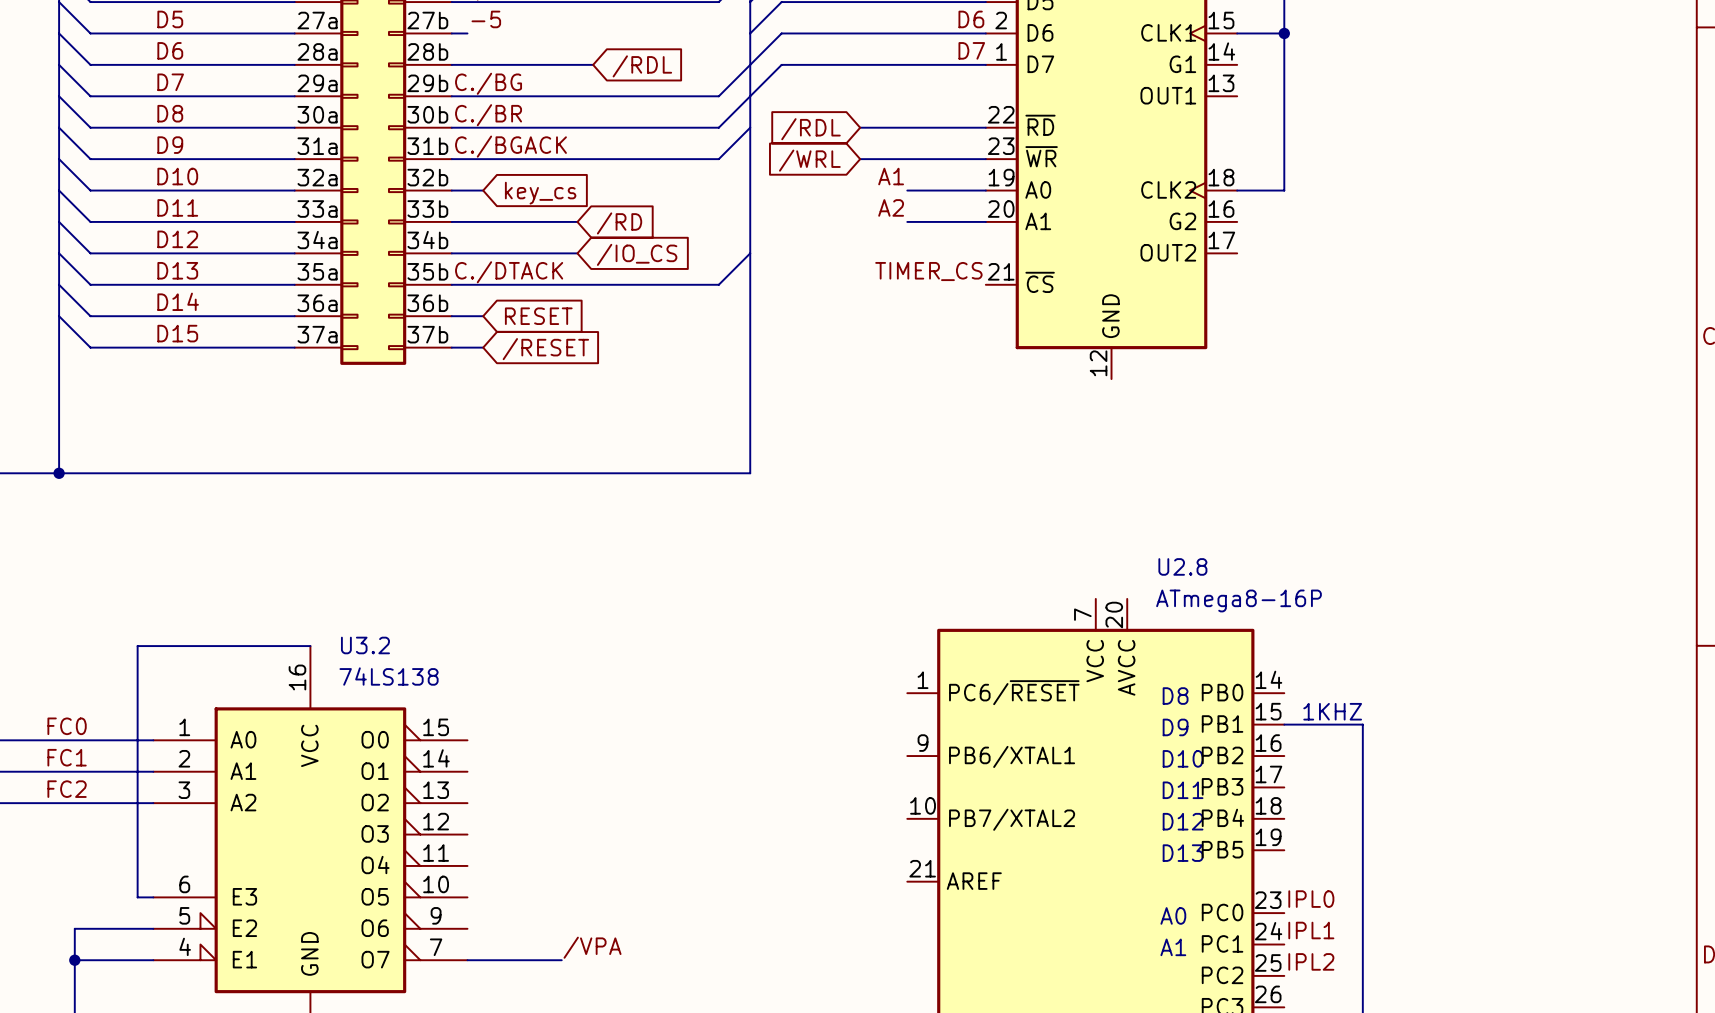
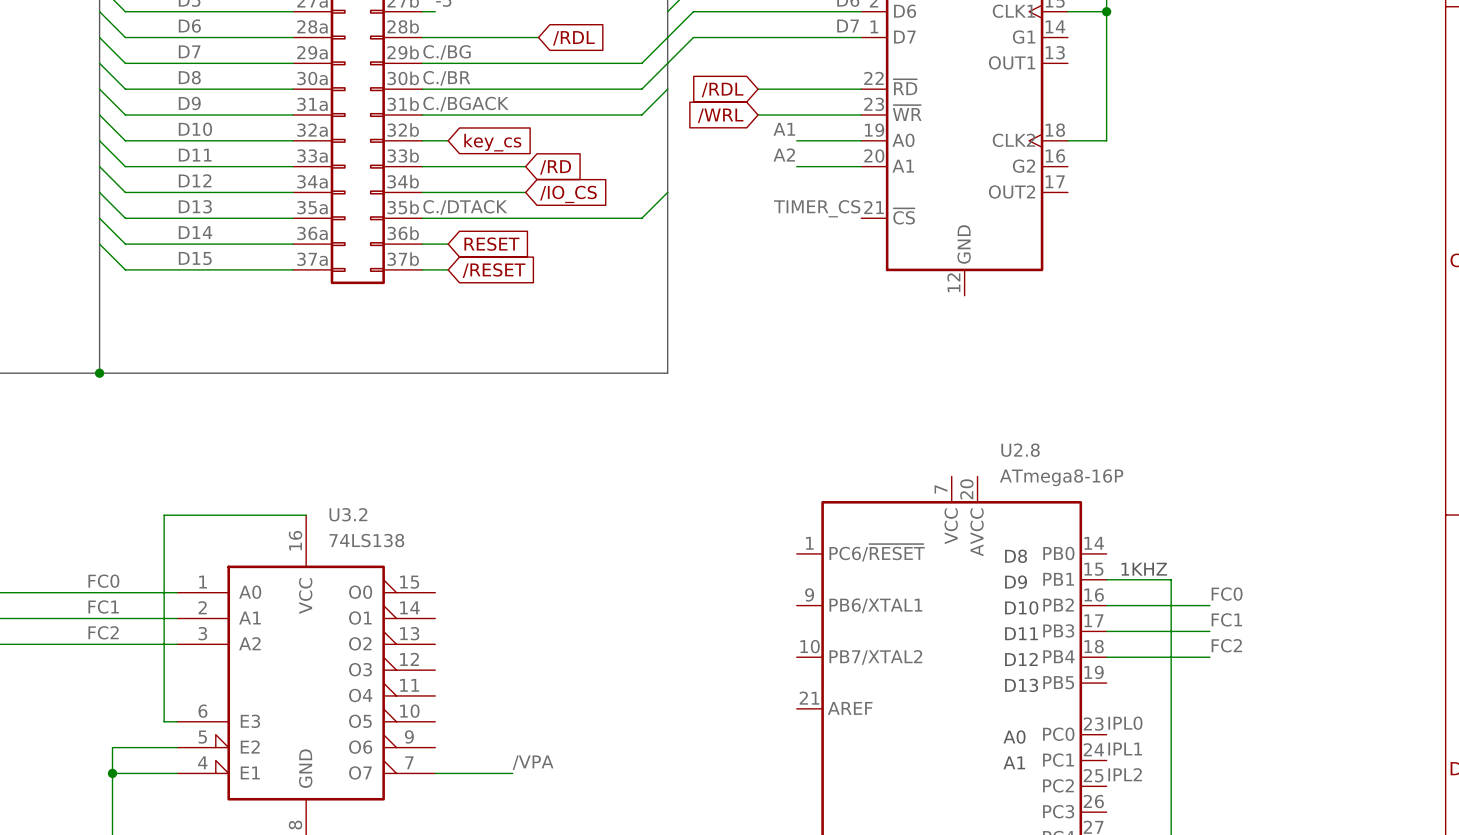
label: none -> FC0 (1227, 594)
wire: none -> (1106, 605) (1209, 605)
label: none -> FC1 (1226, 619)
wire: none -> (1106, 631) (1209, 631)
label: none -> FC2 (1226, 645)
wire: none -> (1106, 657) (1209, 657)

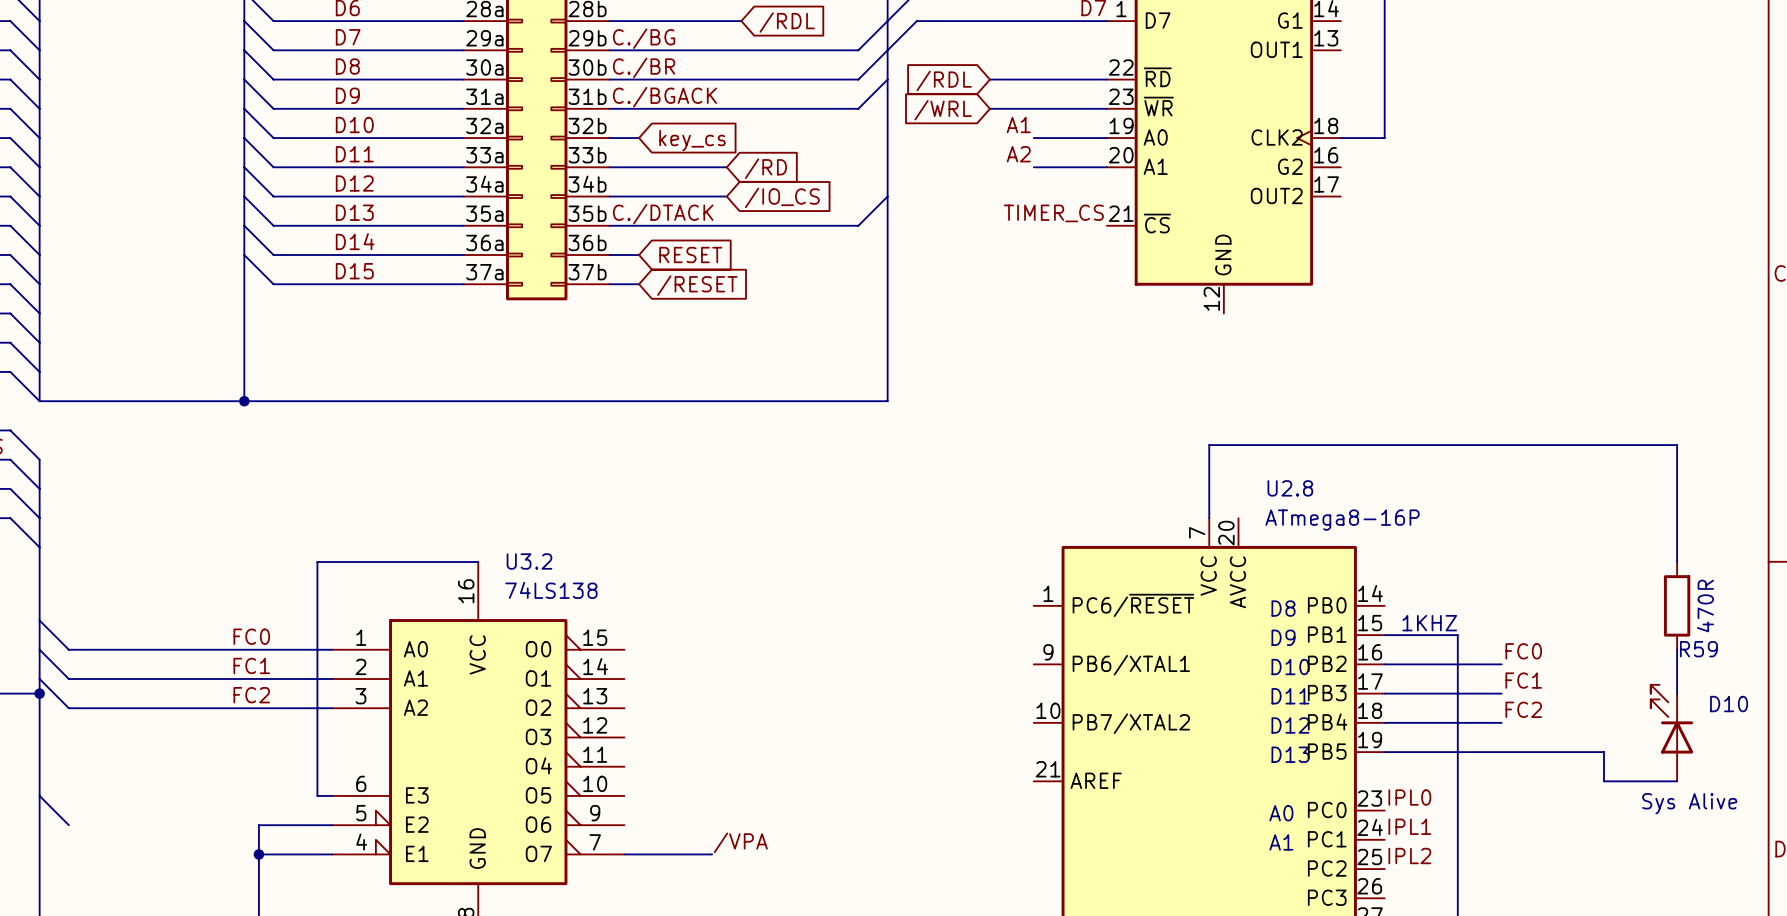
wire: none -> (1209, 518) (1209, 445) (1677, 445) (1677, 562)
R59: none -> 470R (1677, 605)
wire: none -> (1677, 649) (1677, 693)
D10: none -> Sys Alive (1671, 733)
wire: none -> (1384, 752) (1604, 752) (1604, 781) (1677, 781)

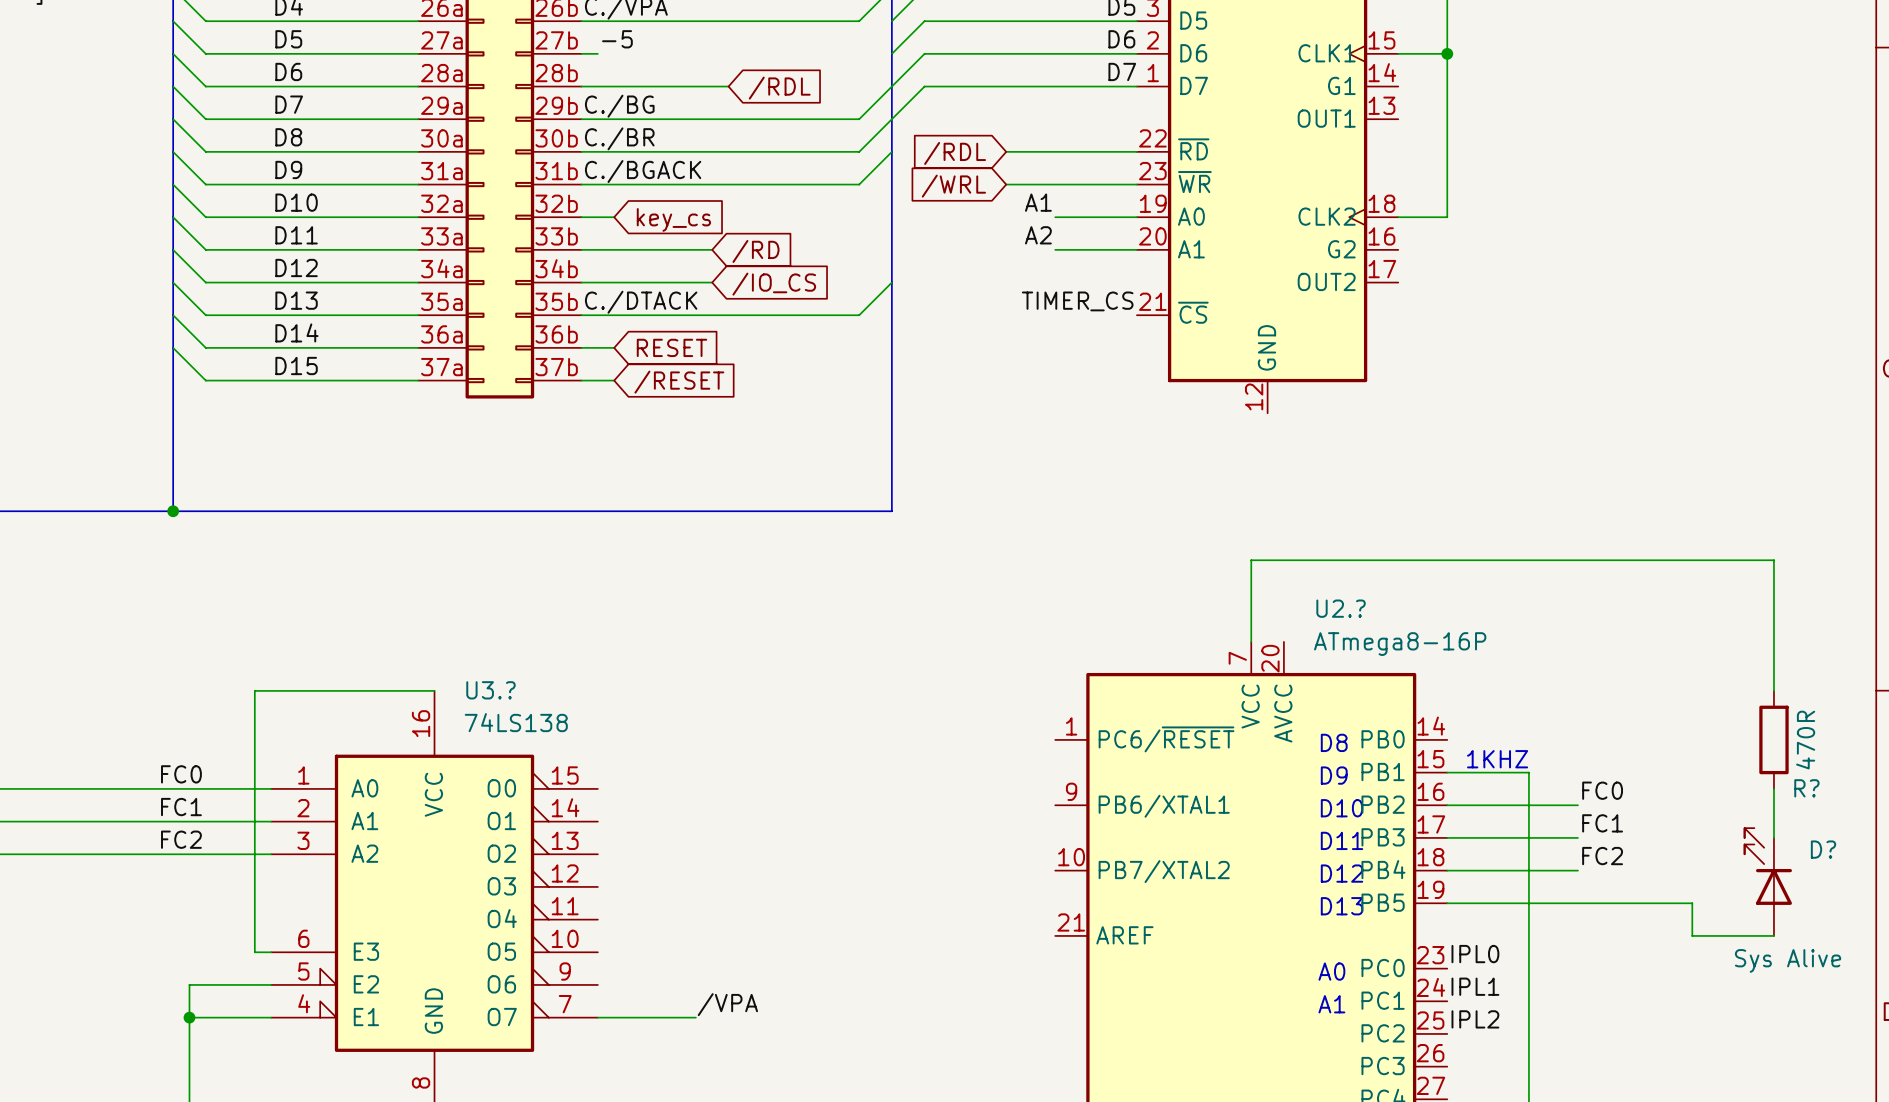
U2.8 name: U2.8 (1290, 488) -> U2.? (1341, 608)
U3.2 name: U3.2 (529, 561) -> U3.? (490, 690)
R59 name: R59 (1698, 649) -> R? (1806, 788)
D10 name: D10 (1729, 704) -> D? (1823, 849)

